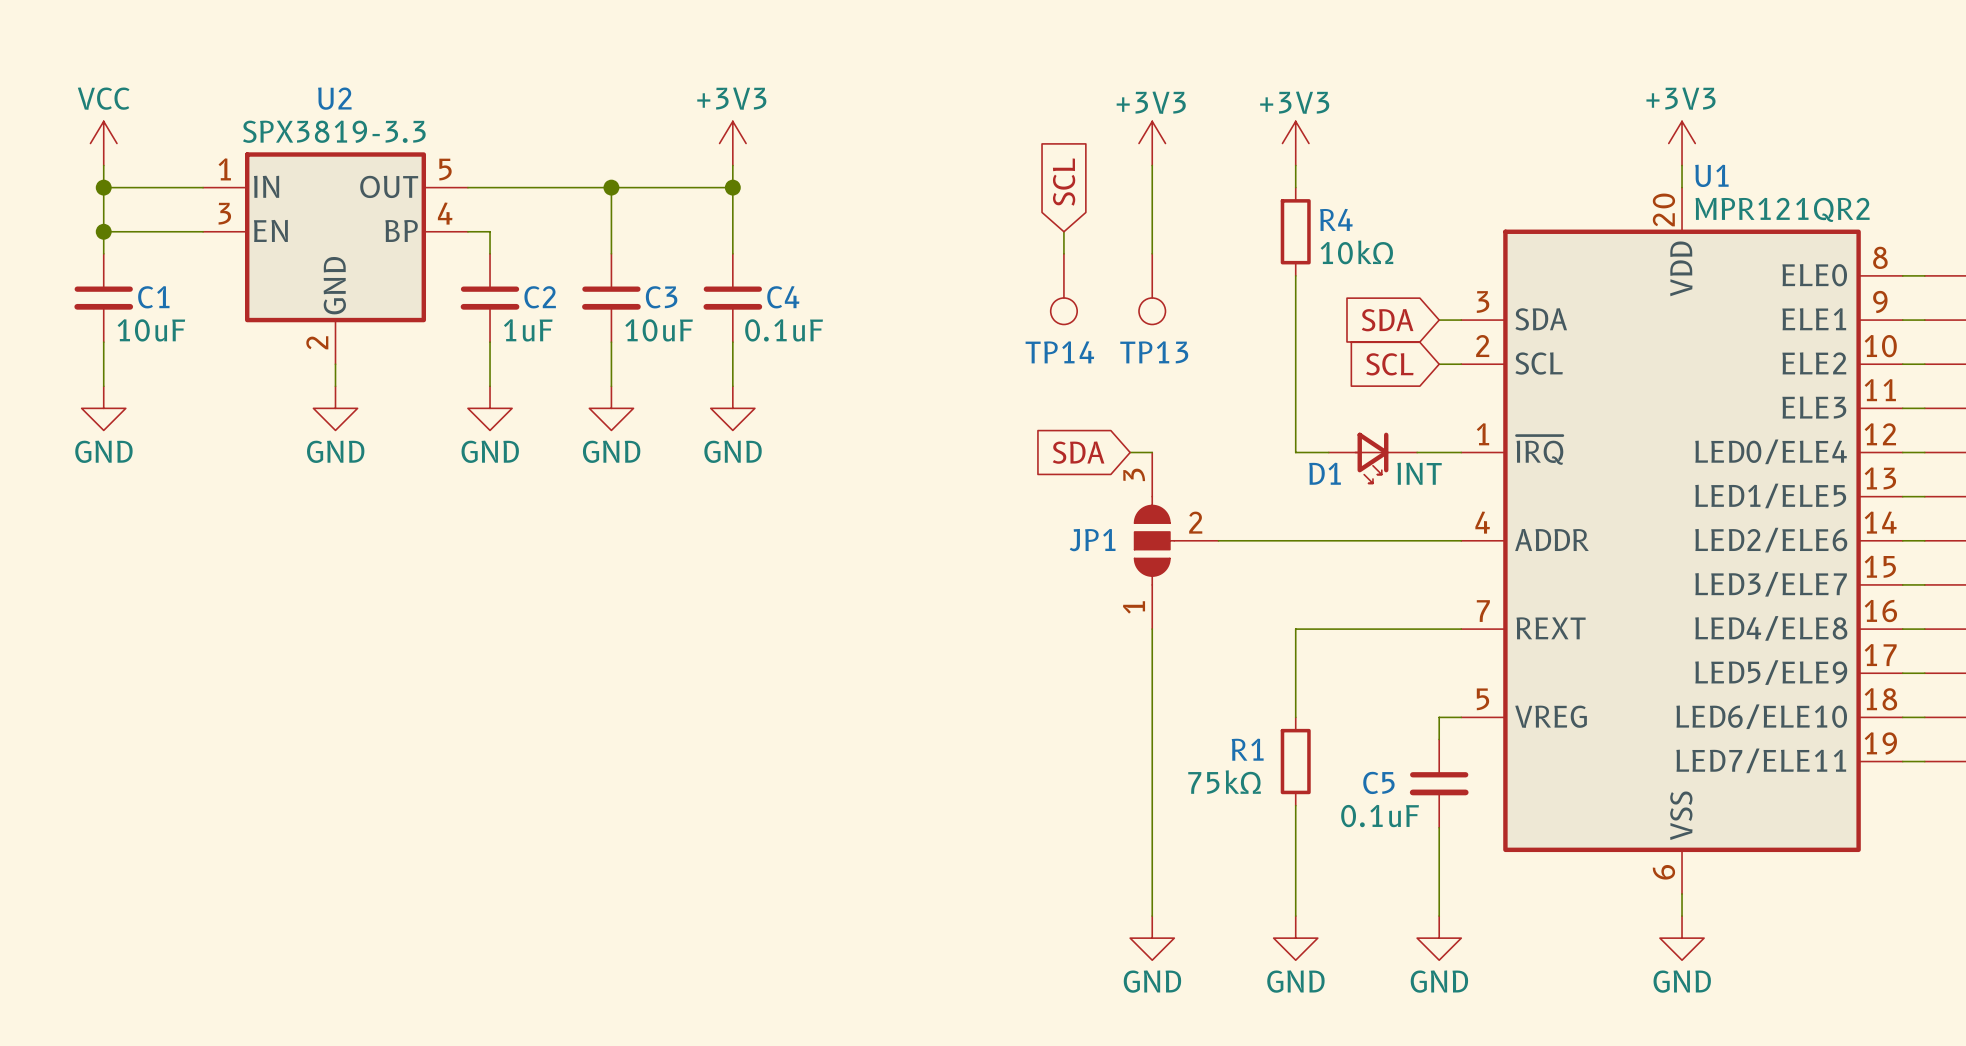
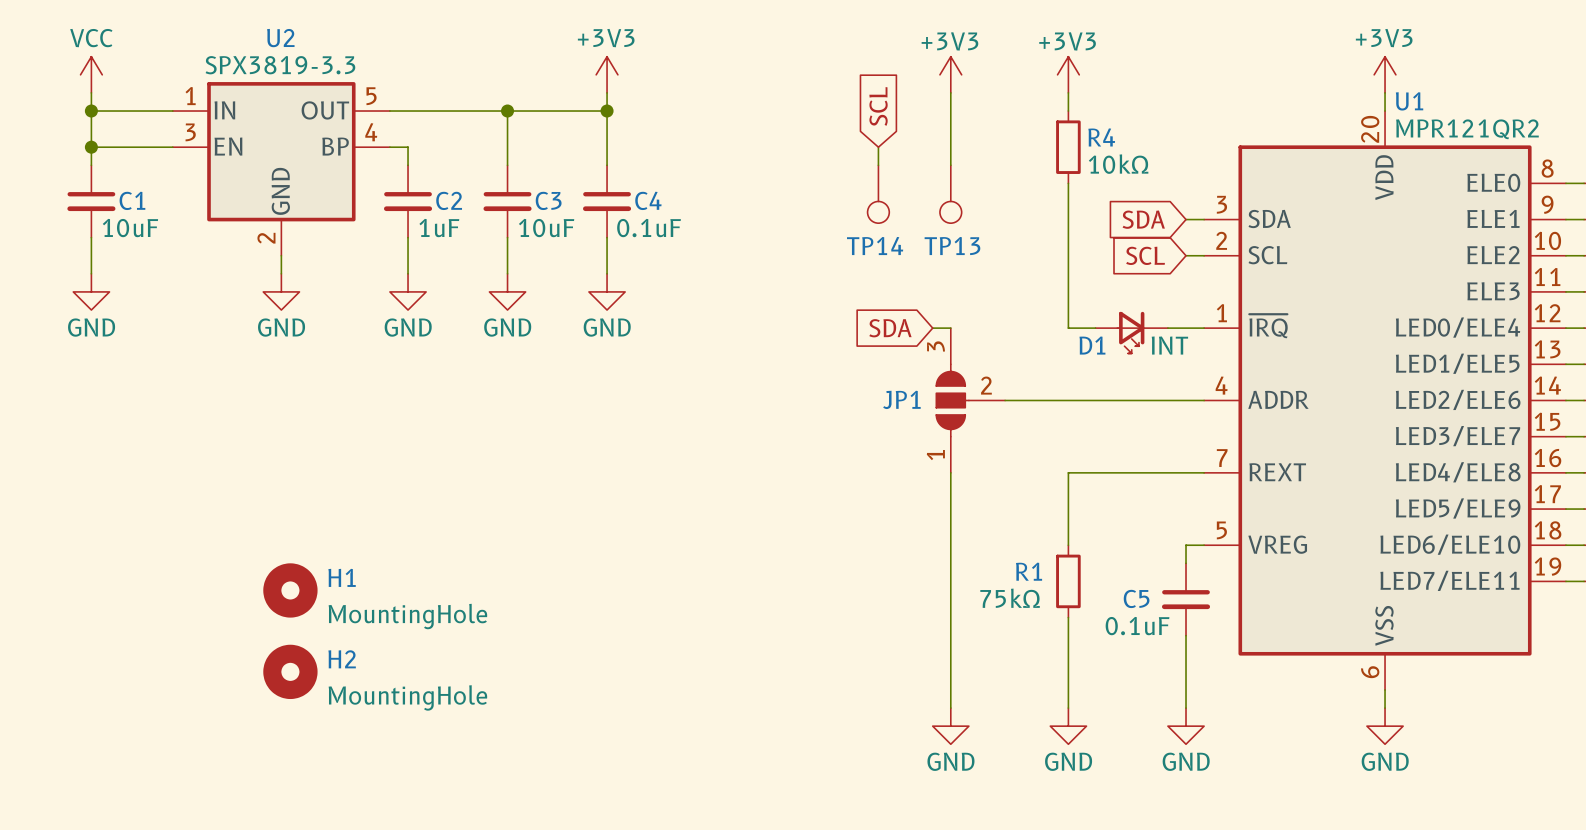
H1: none -> MountingHole (290, 590)
H2: none -> MountingHole (290, 671)

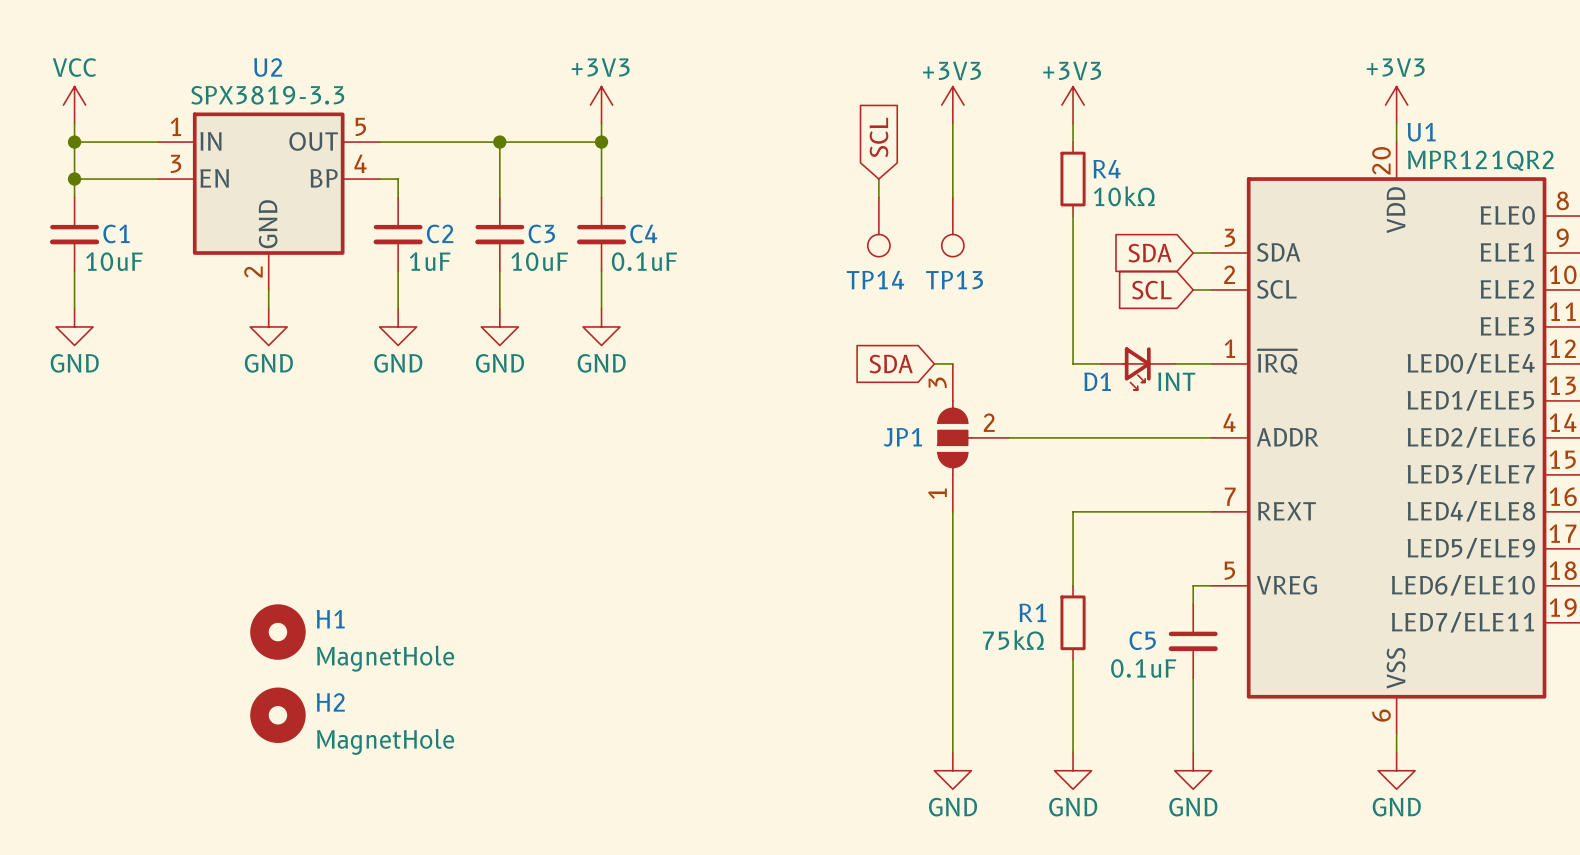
H1 value: MountingHole (407, 616) -> MagnetHole (385, 658)
H2 value: MountingHole (407, 697) -> MagnetHole (385, 741)

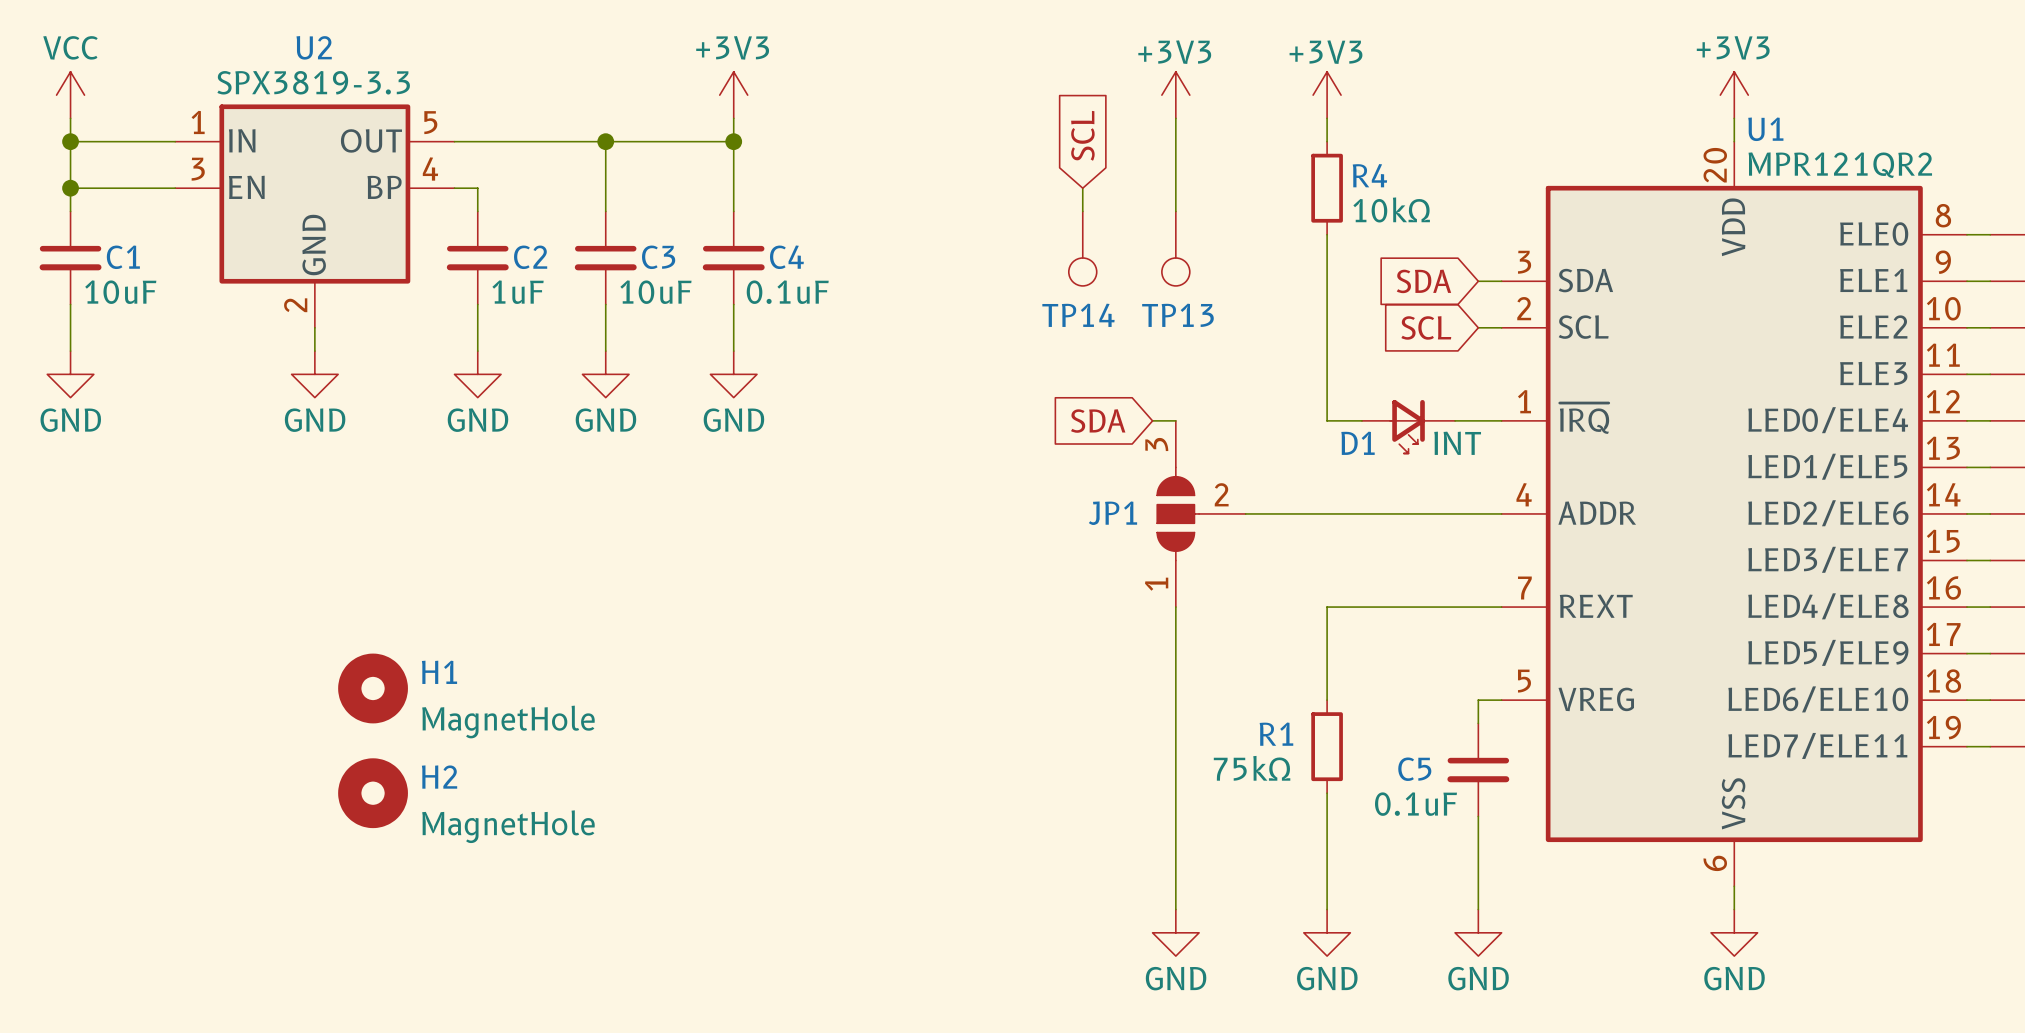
H1 position: (277, 632) -> (373, 688)
H2 position: (277, 715) -> (373, 793)

